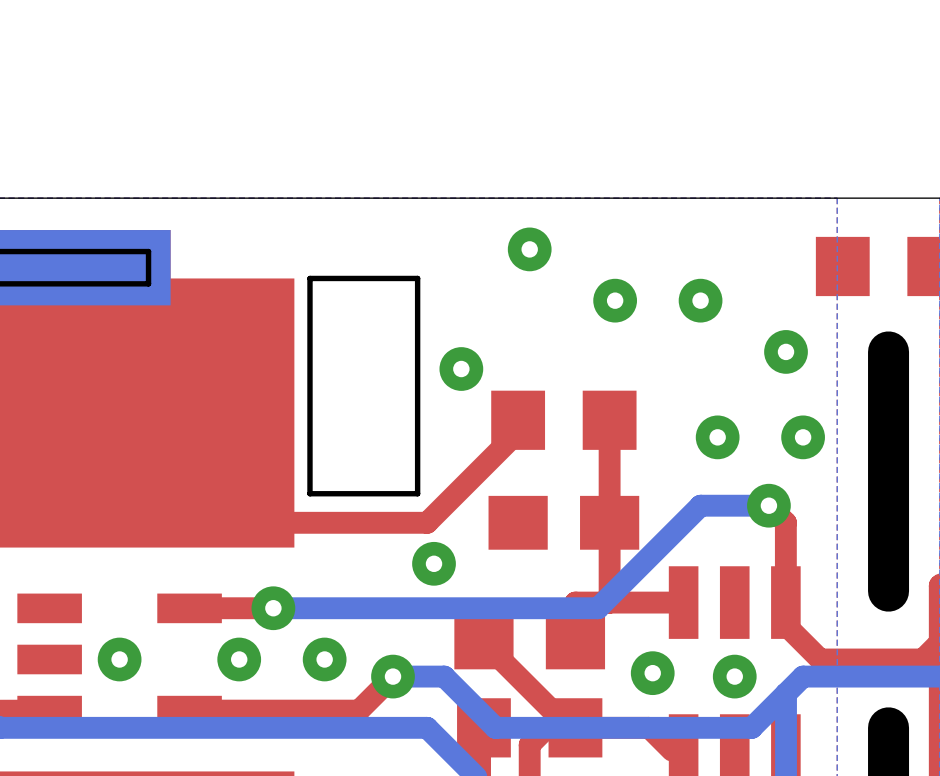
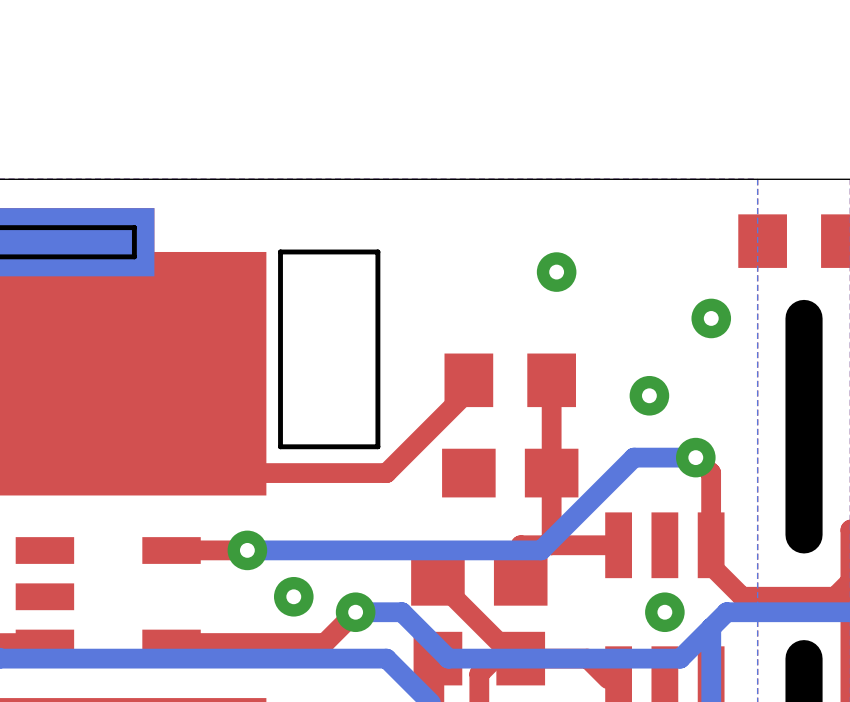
via: (529, 249) -> none
via: (700, 300) -> none
via: (461, 369) -> none
via: (803, 437) -> none
via: (434, 563) -> none
via: (119, 659) -> none
via: (239, 659) -> none
via: (652, 673) -> none

